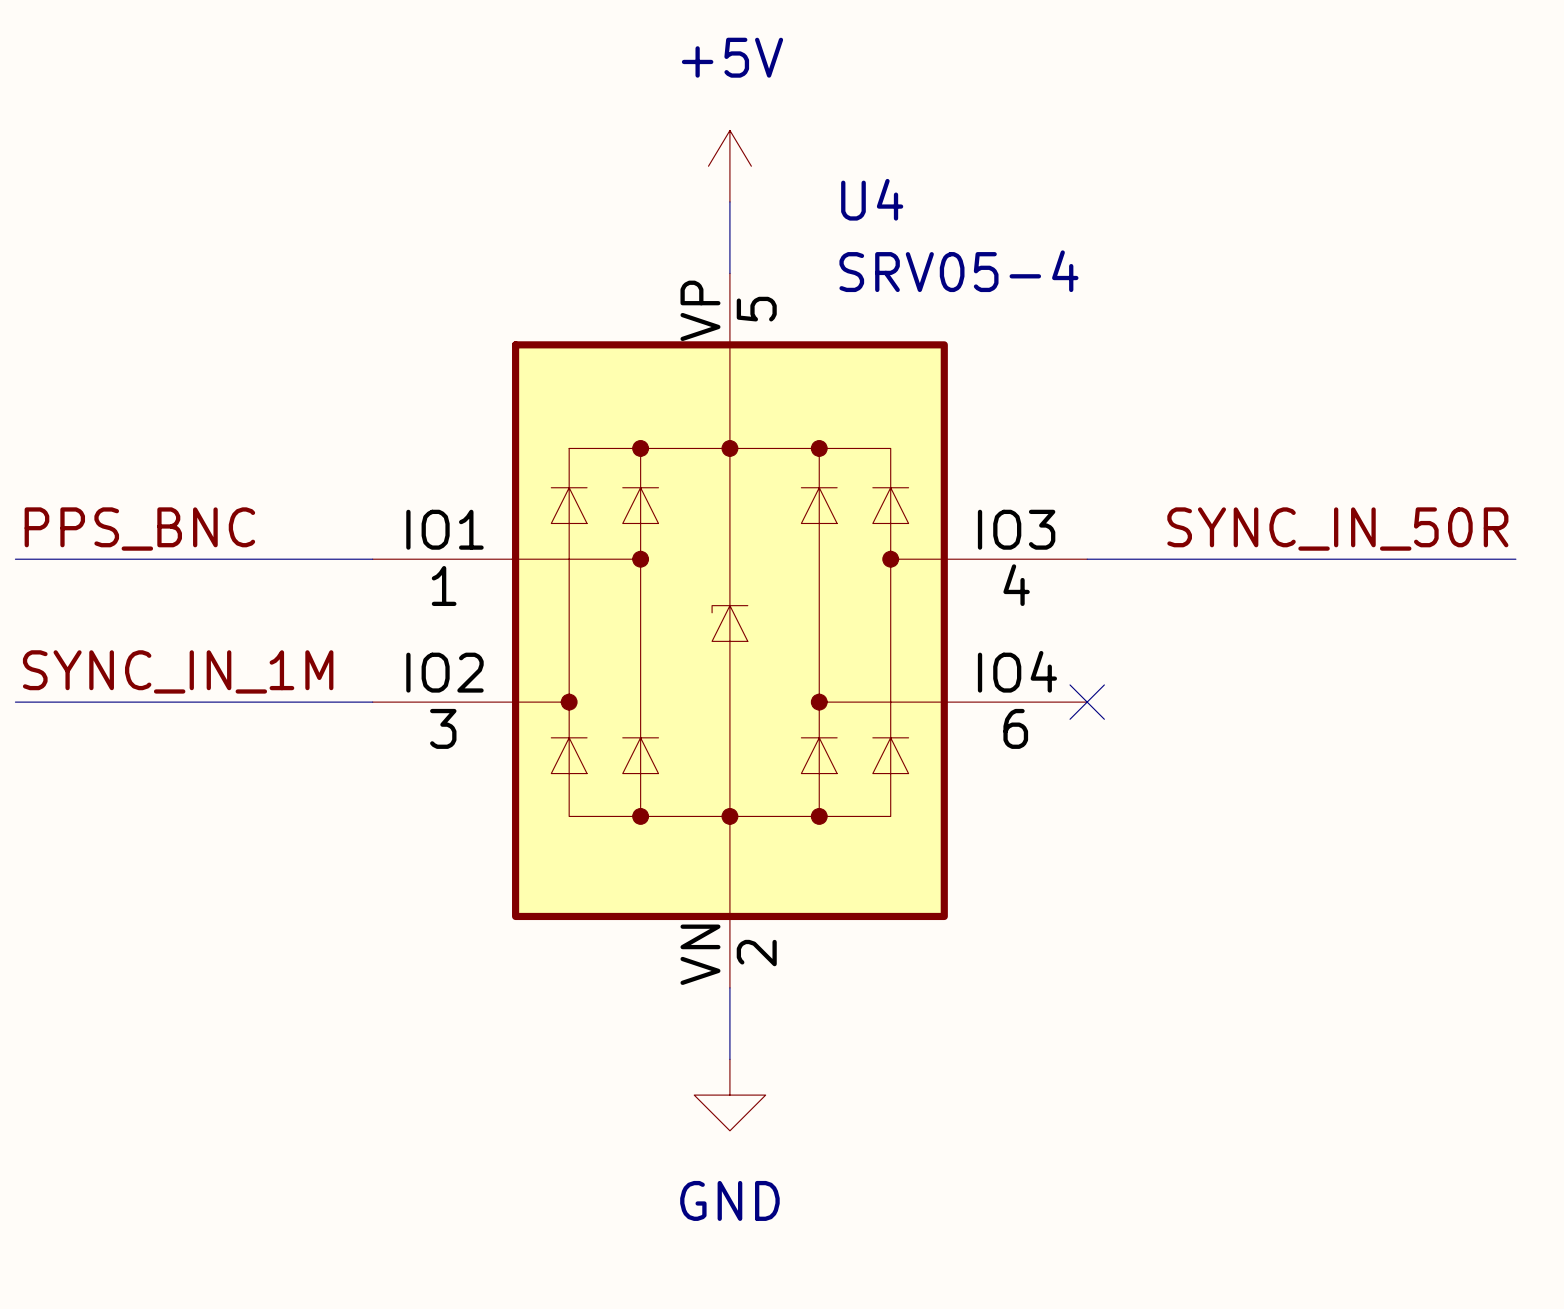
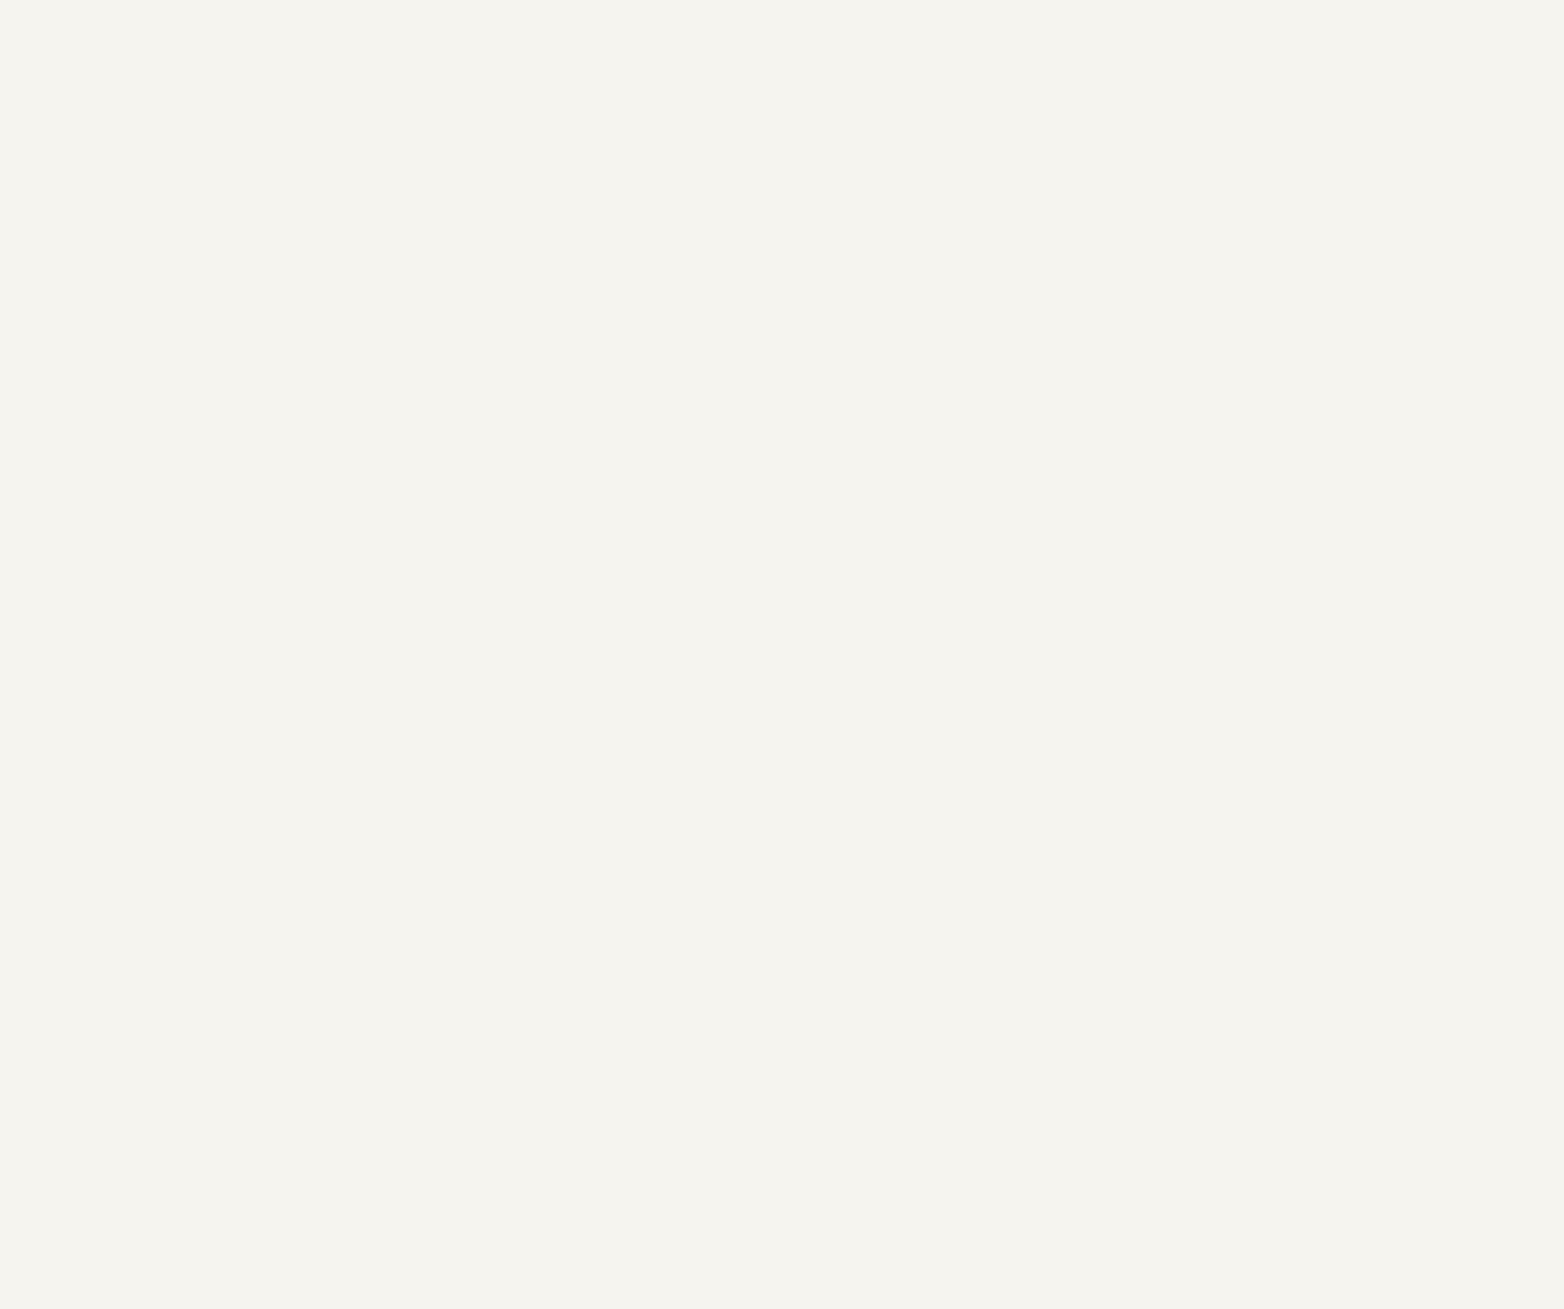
power symbol: +5V (729, 166) -> none
wire: (729, 201) (729, 273) -> none
label: PPS_BNC (139, 529) -> none
label: SYNC_IN_50R (1337, 529) -> none
wire: (15, 559) (372, 559) -> none
wire: (1087, 559) (1515, 559) -> none
U4: SRV05-4 (729, 630) -> none
label: SYNC_IN_1M (178, 671) -> none
wire: (15, 702) (372, 702) -> none
no-connect mark: (1087, 702) -> none
wire: (729, 987) (729, 1059) -> none
power symbol: GND (729, 1095) -> none

